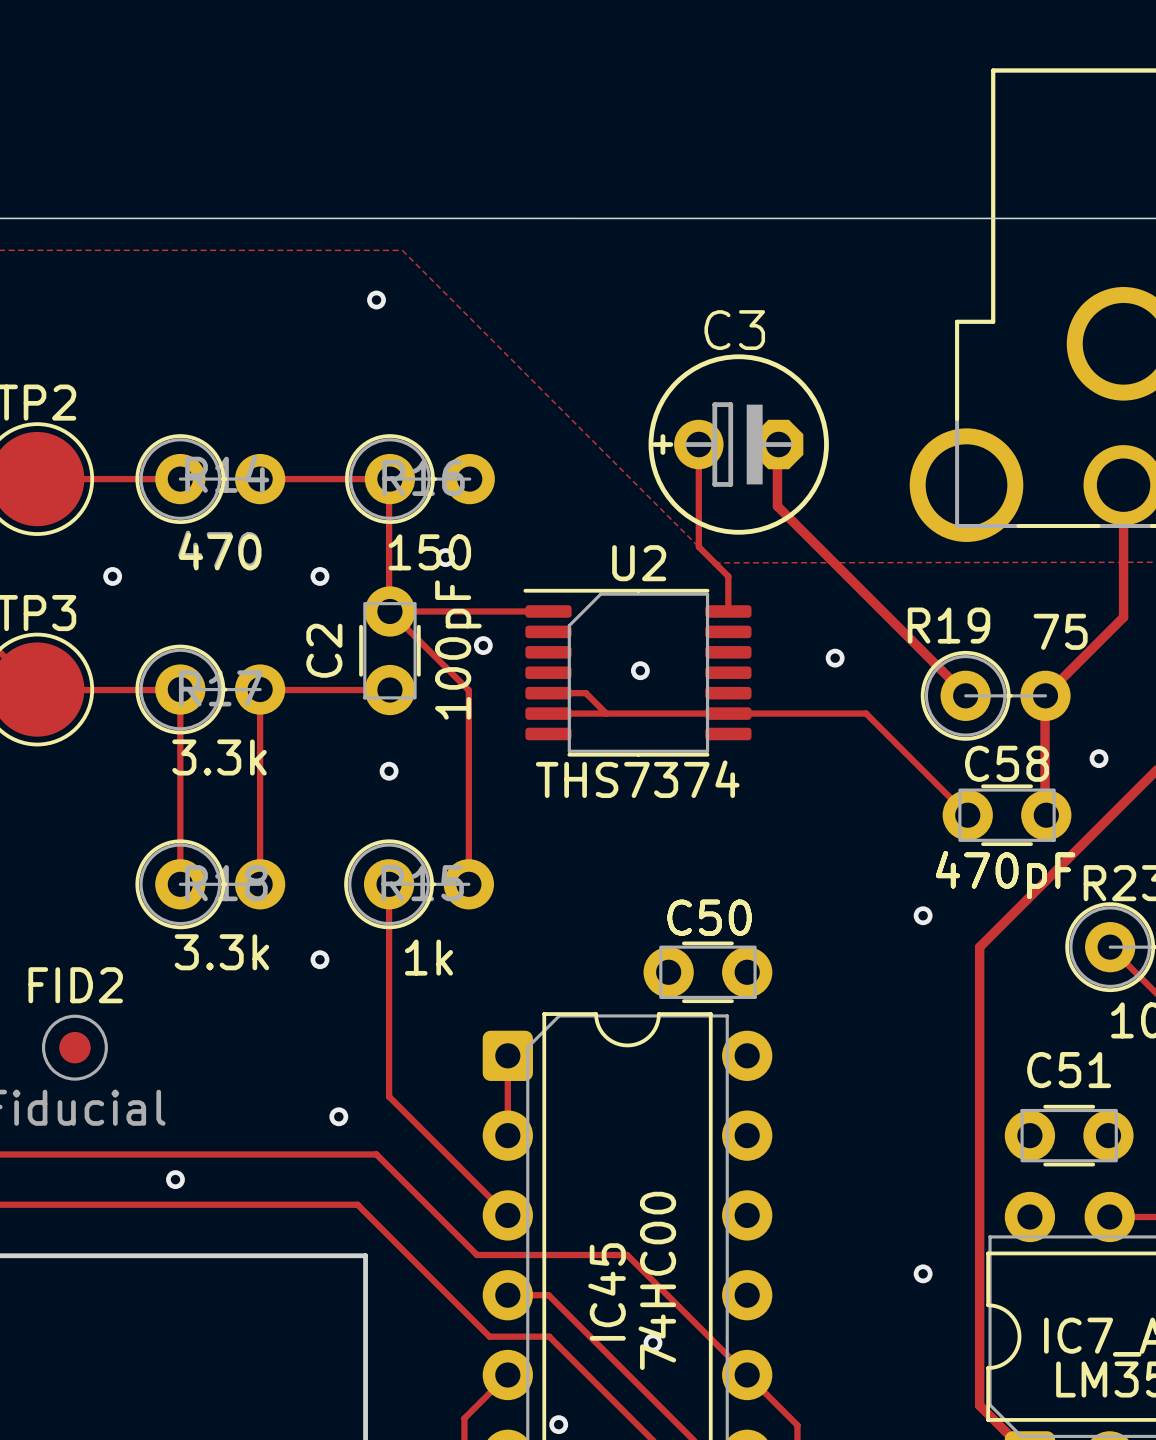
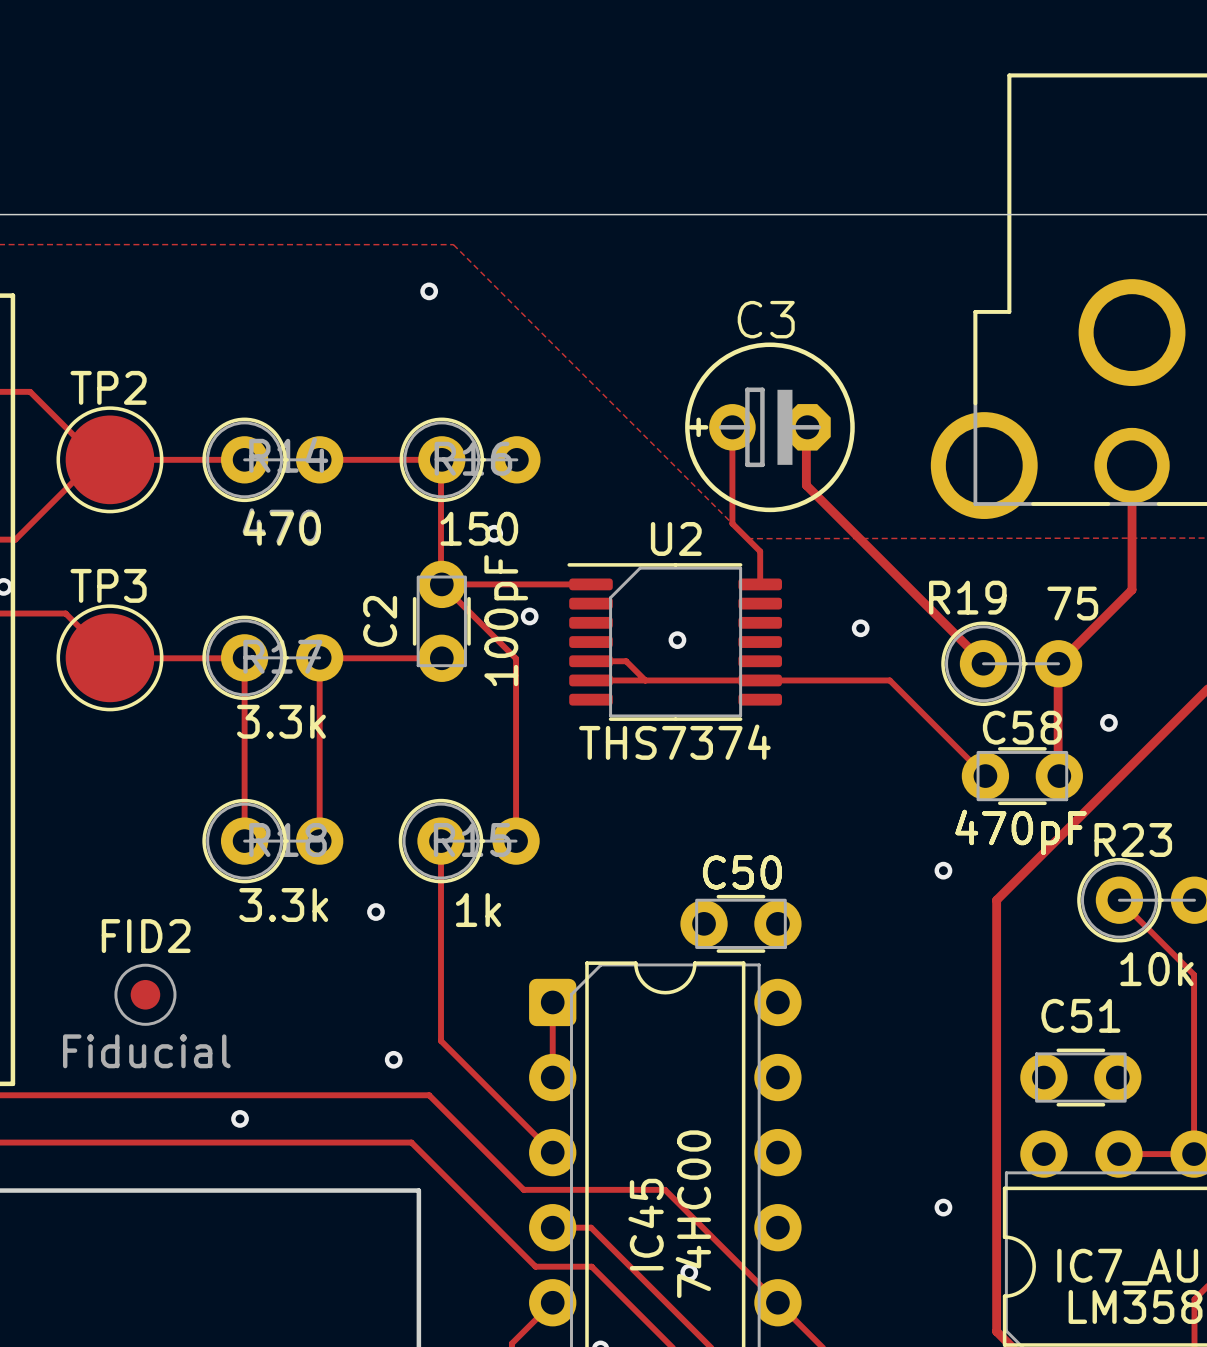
via: (112, 576) -> none
via: (319, 576) -> none
via: (389, 771) -> none

